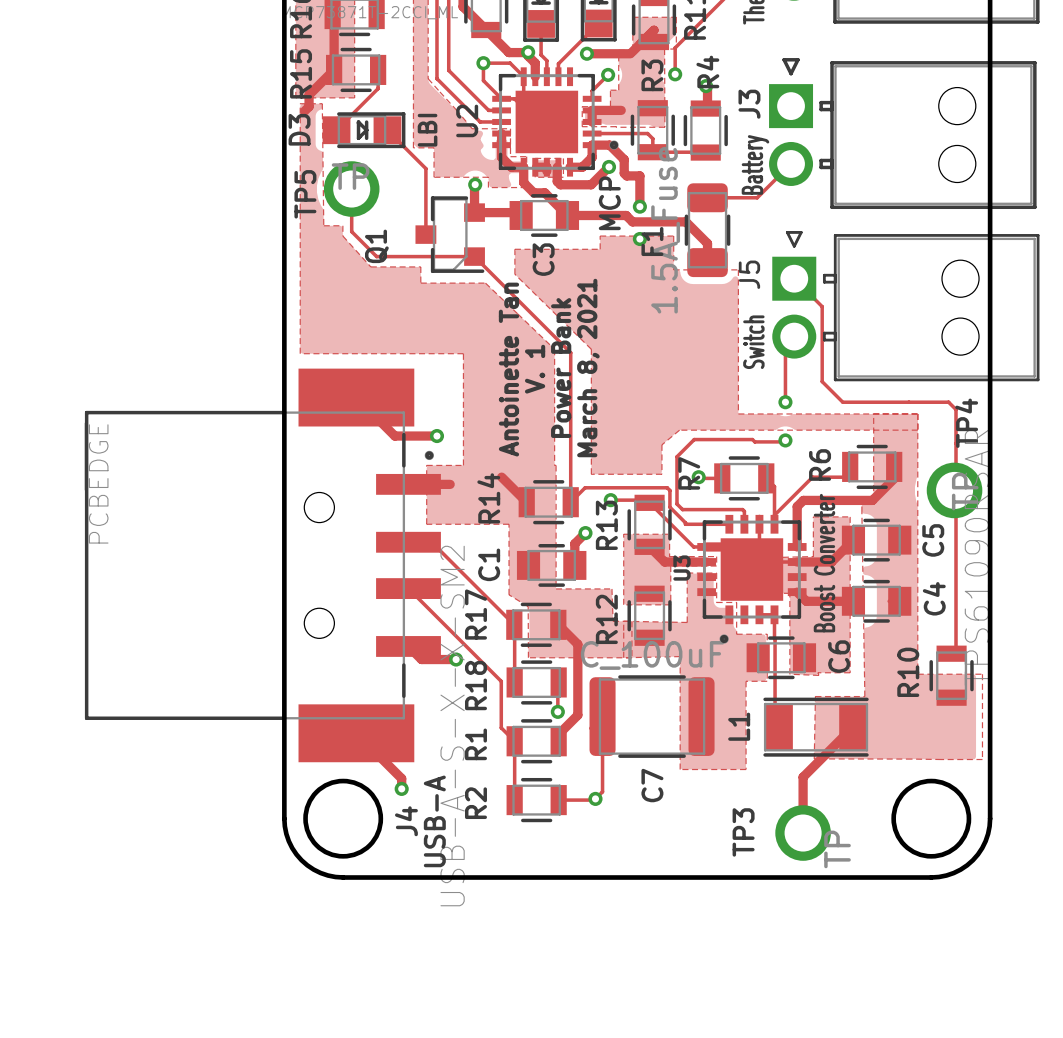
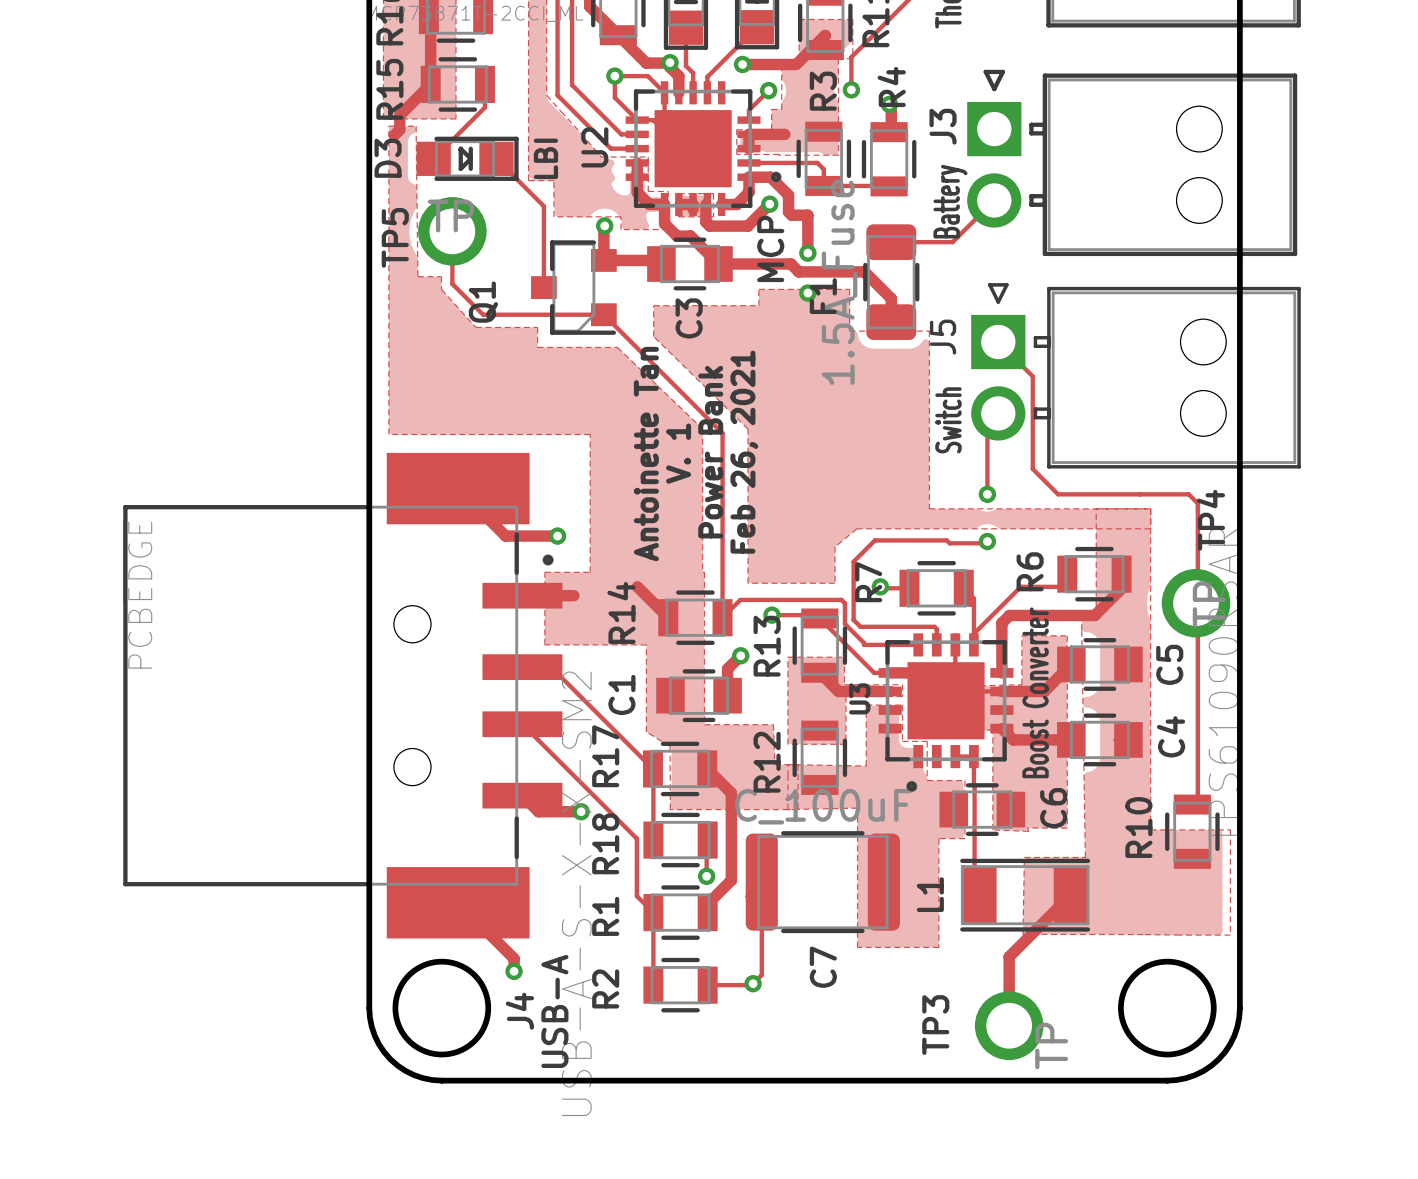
text: March 8, 2021 (588, 368) -> Feb 26, 2021 (744, 452)

